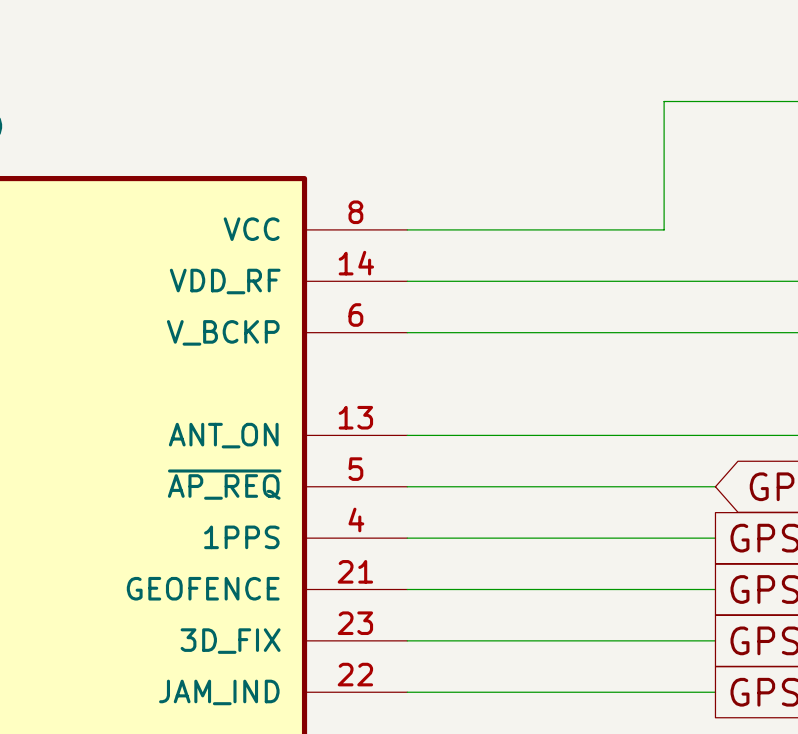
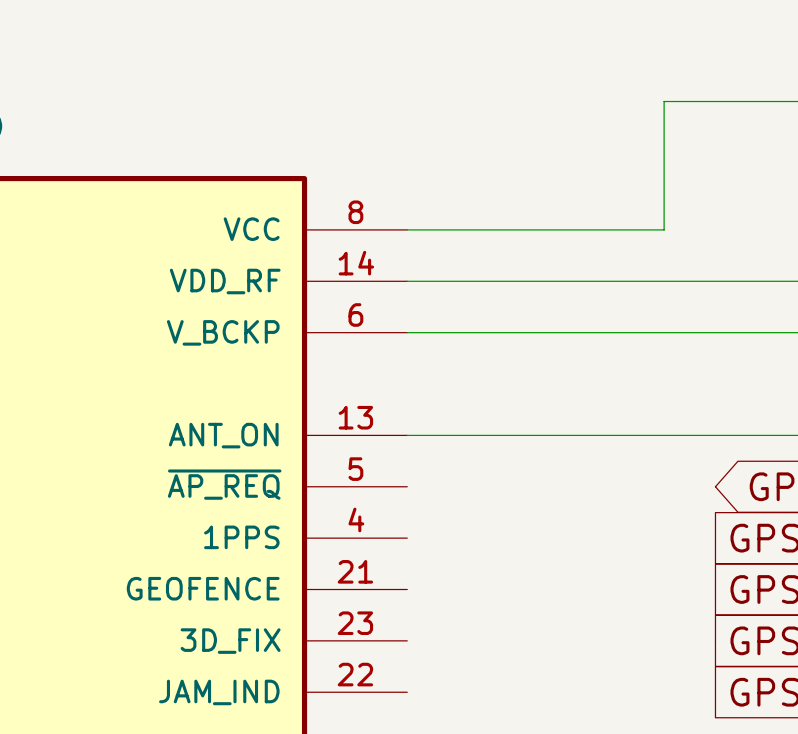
wire: (407, 486) (715, 486) -> none
wire: (407, 538) (715, 538) -> none
wire: (407, 589) (715, 589) -> none
wire: (407, 640) (715, 640) -> none
wire: (407, 692) (715, 692) -> none

